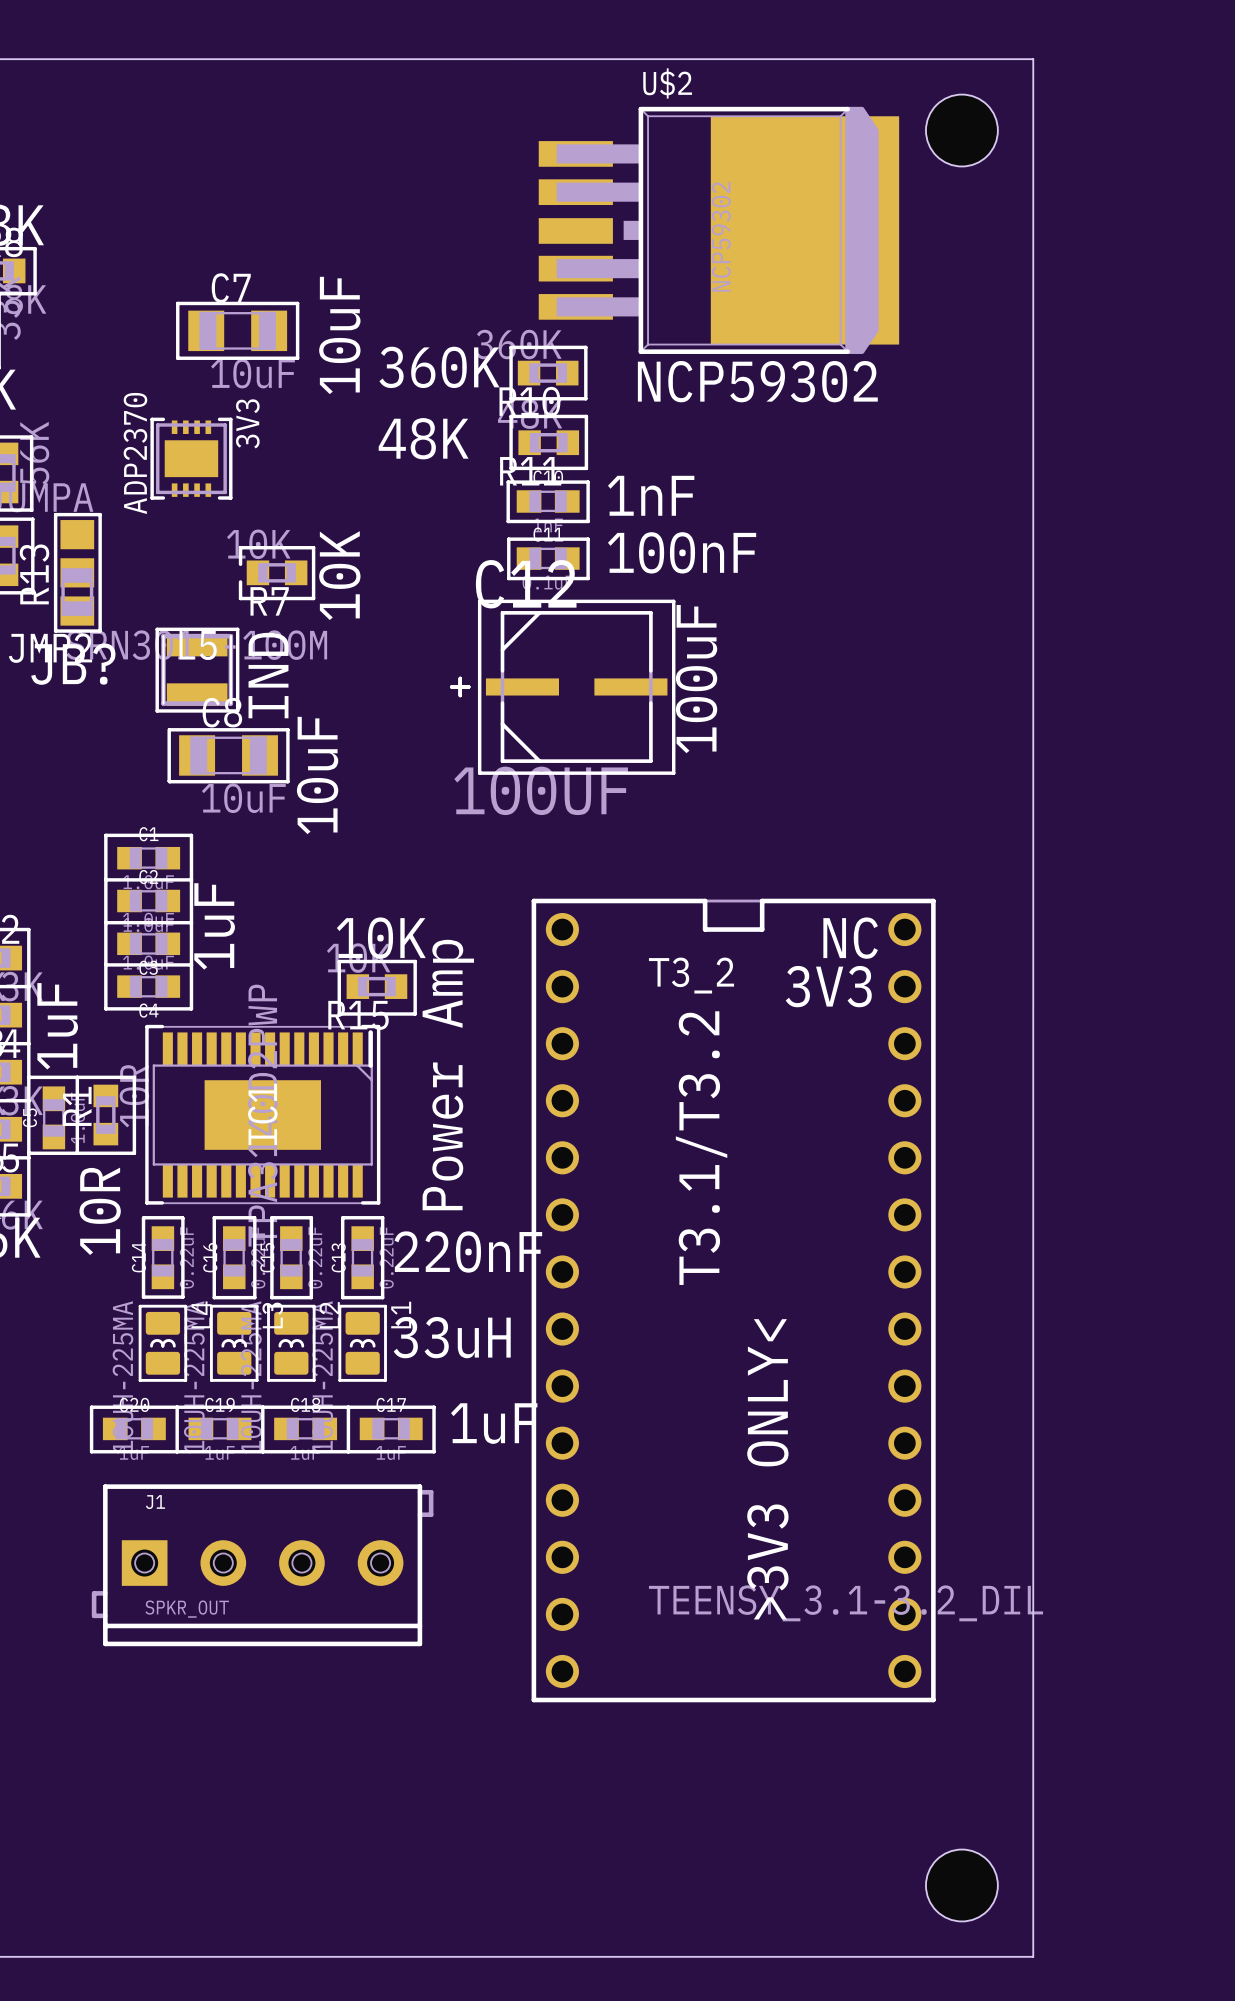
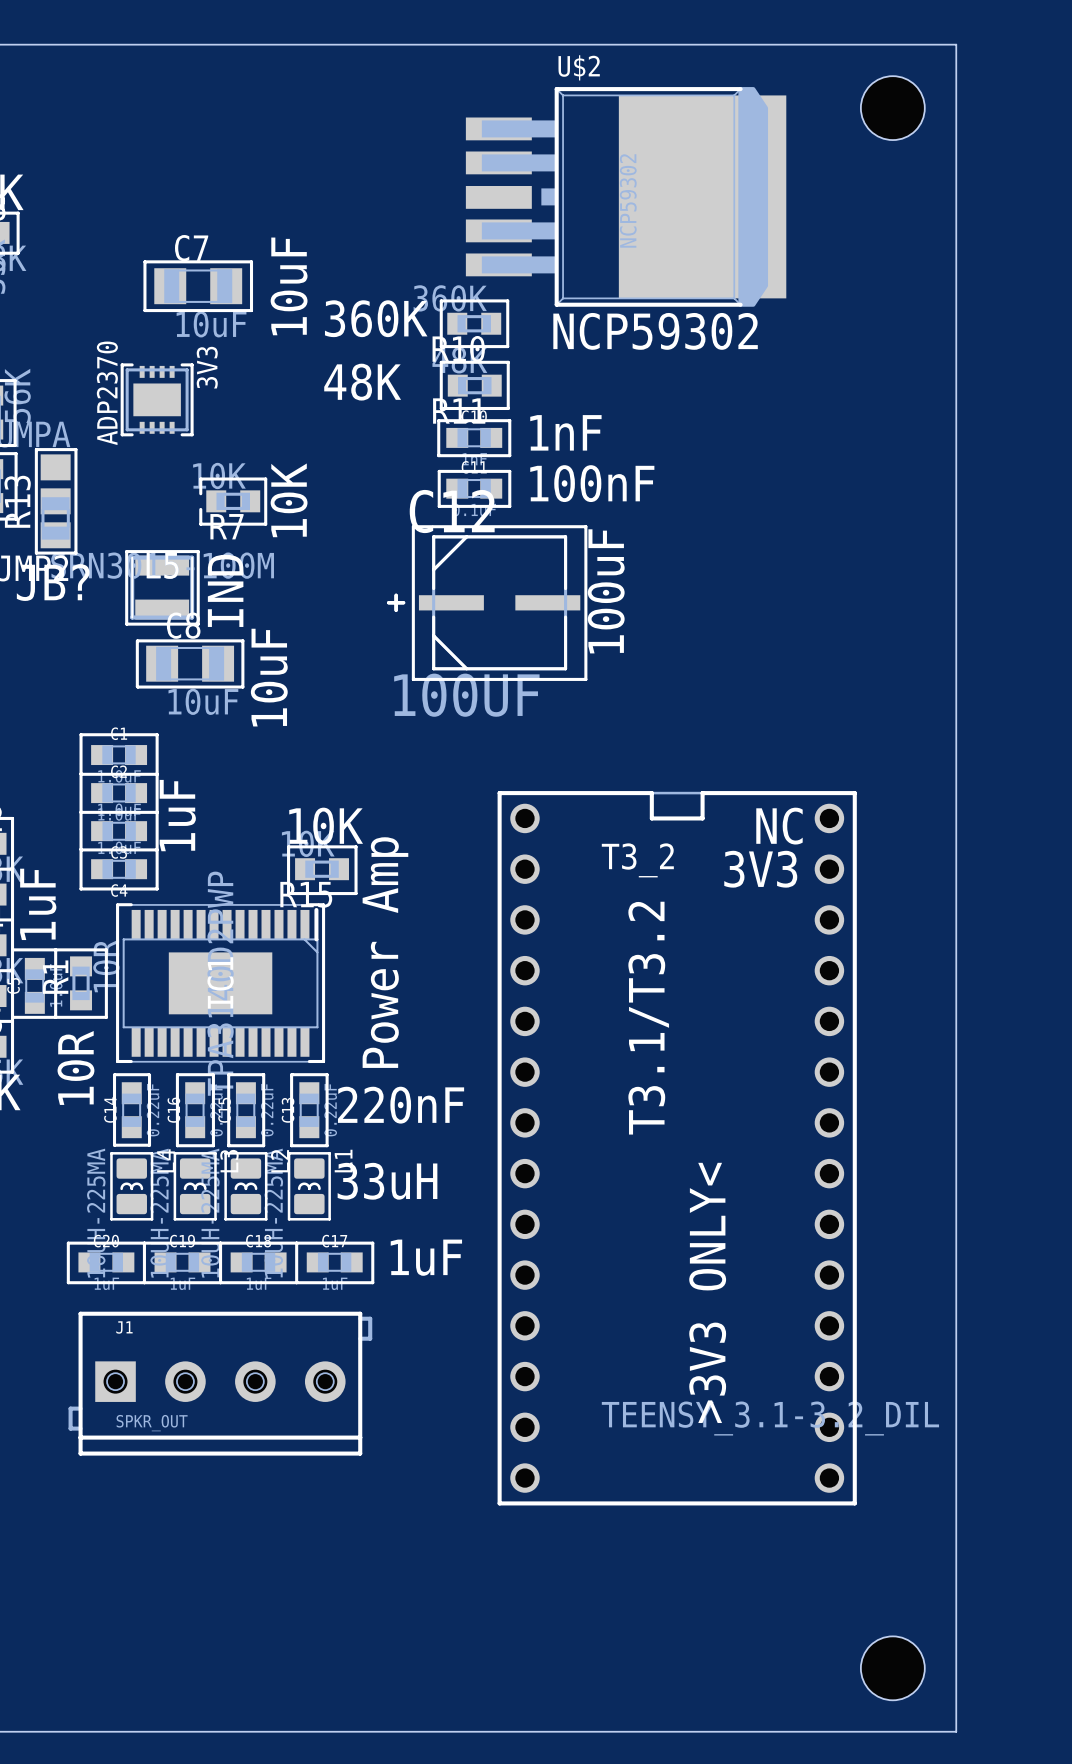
board edge: (1033, 59) (1033, 1956) -> (905, 44) (956, 44) (956, 1731) (905, 1731)
hole position: (961, 130) -> (892, 108)
text position: NC (850, 938) -> NC (779, 826)
text position: 3V3 (828, 986) -> 3V3 (760, 869)
text position: T3.1/T3.2 (701, 1148) -> T3.1/T3.2 (648, 1018)
T3_2 position: (733, 1300) -> (677, 1148)
text position: >3V3 ONLY< (767, 1469) -> >3V3 ONLY< (707, 1292)
hole position: (961, 1885) -> (892, 1668)

